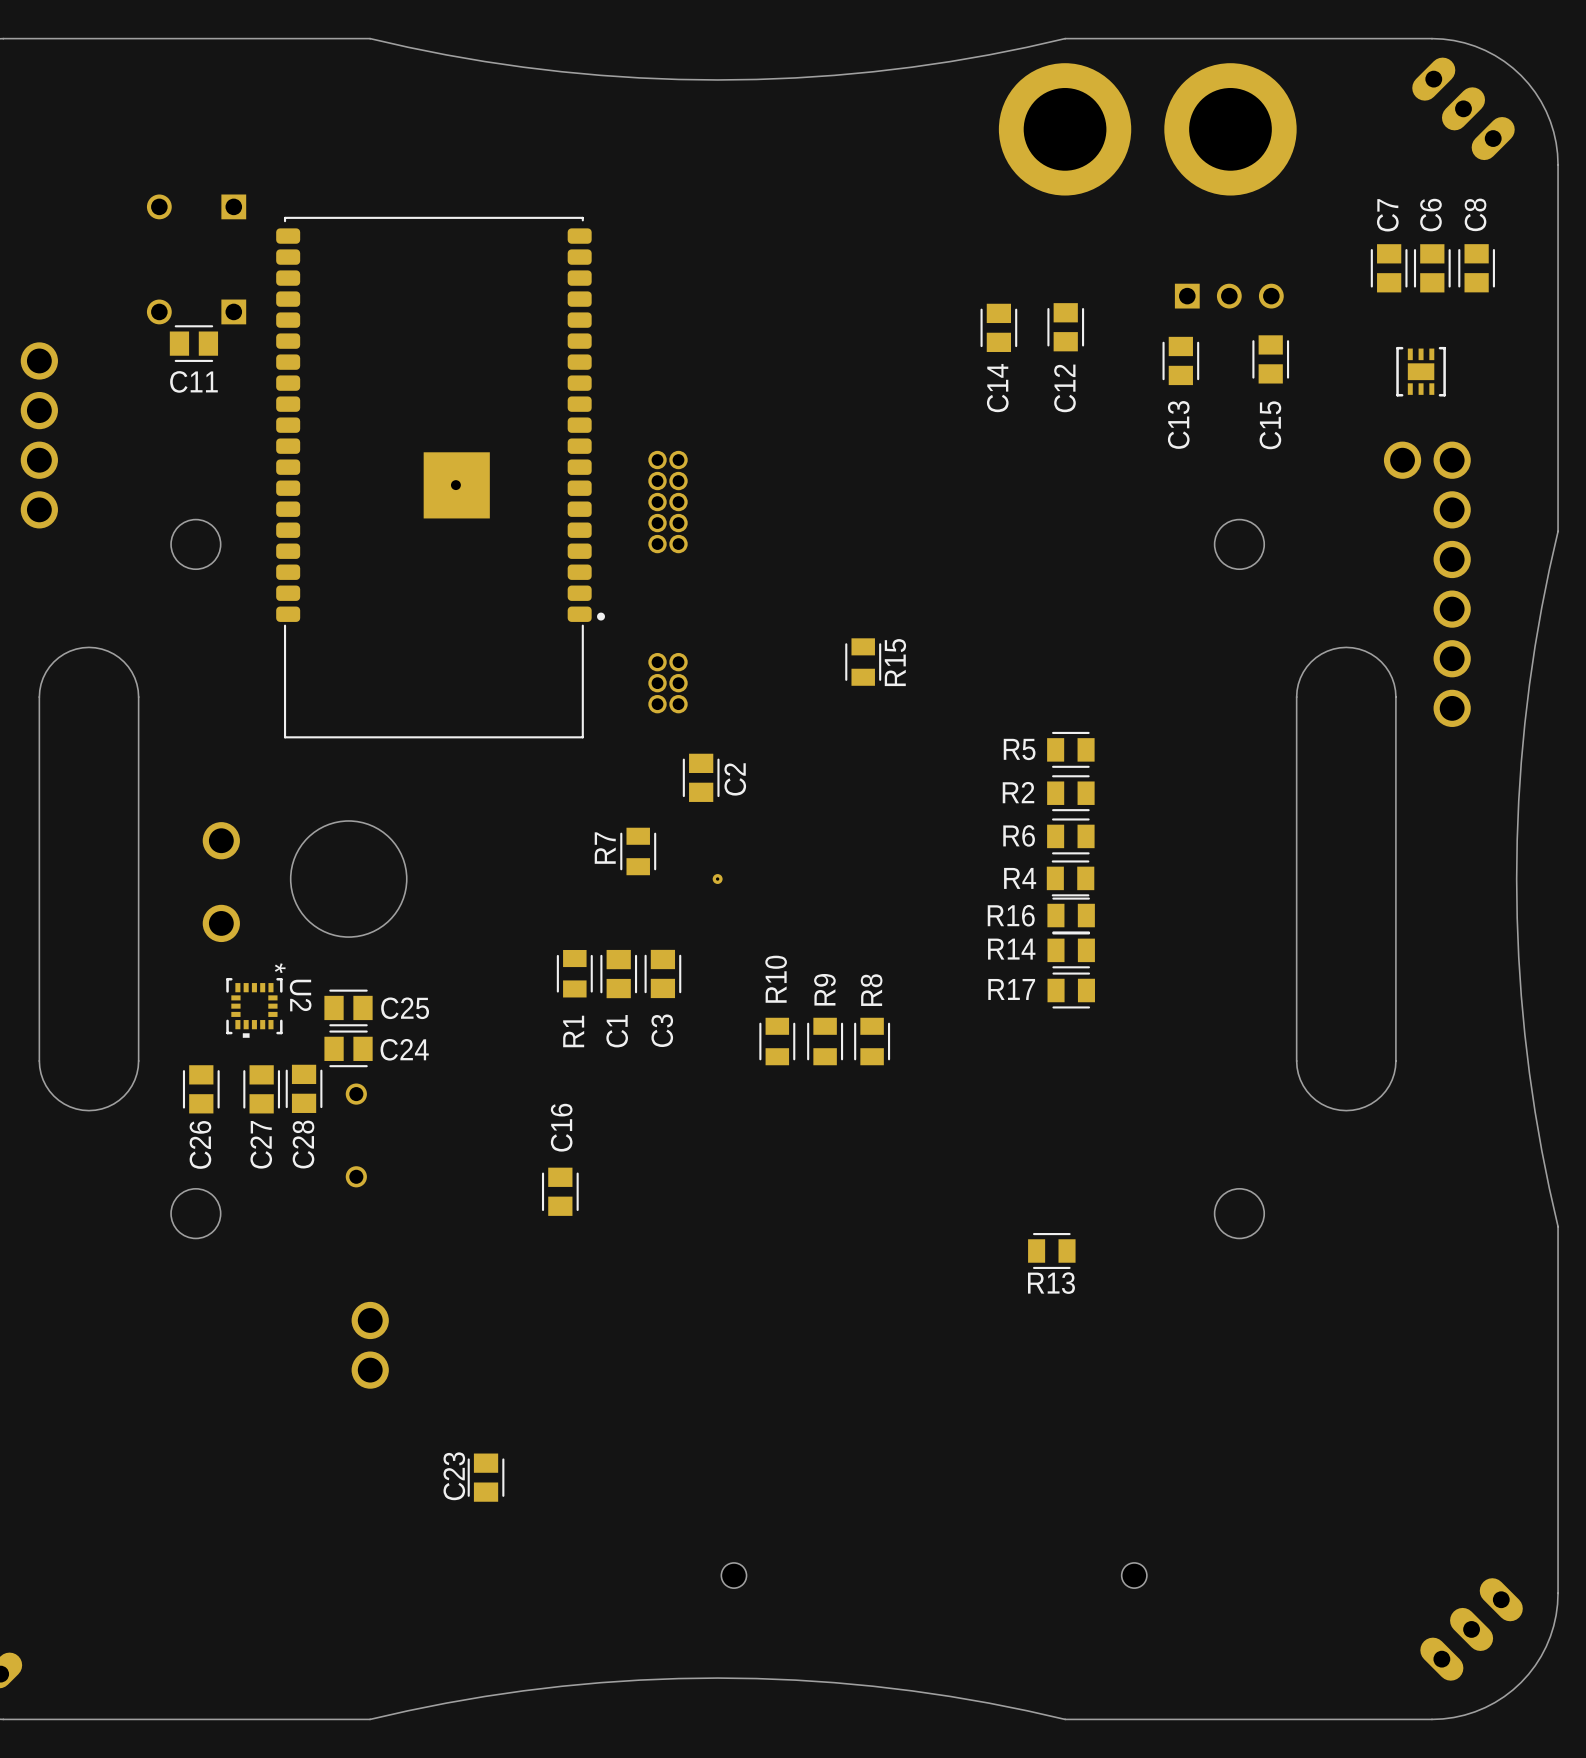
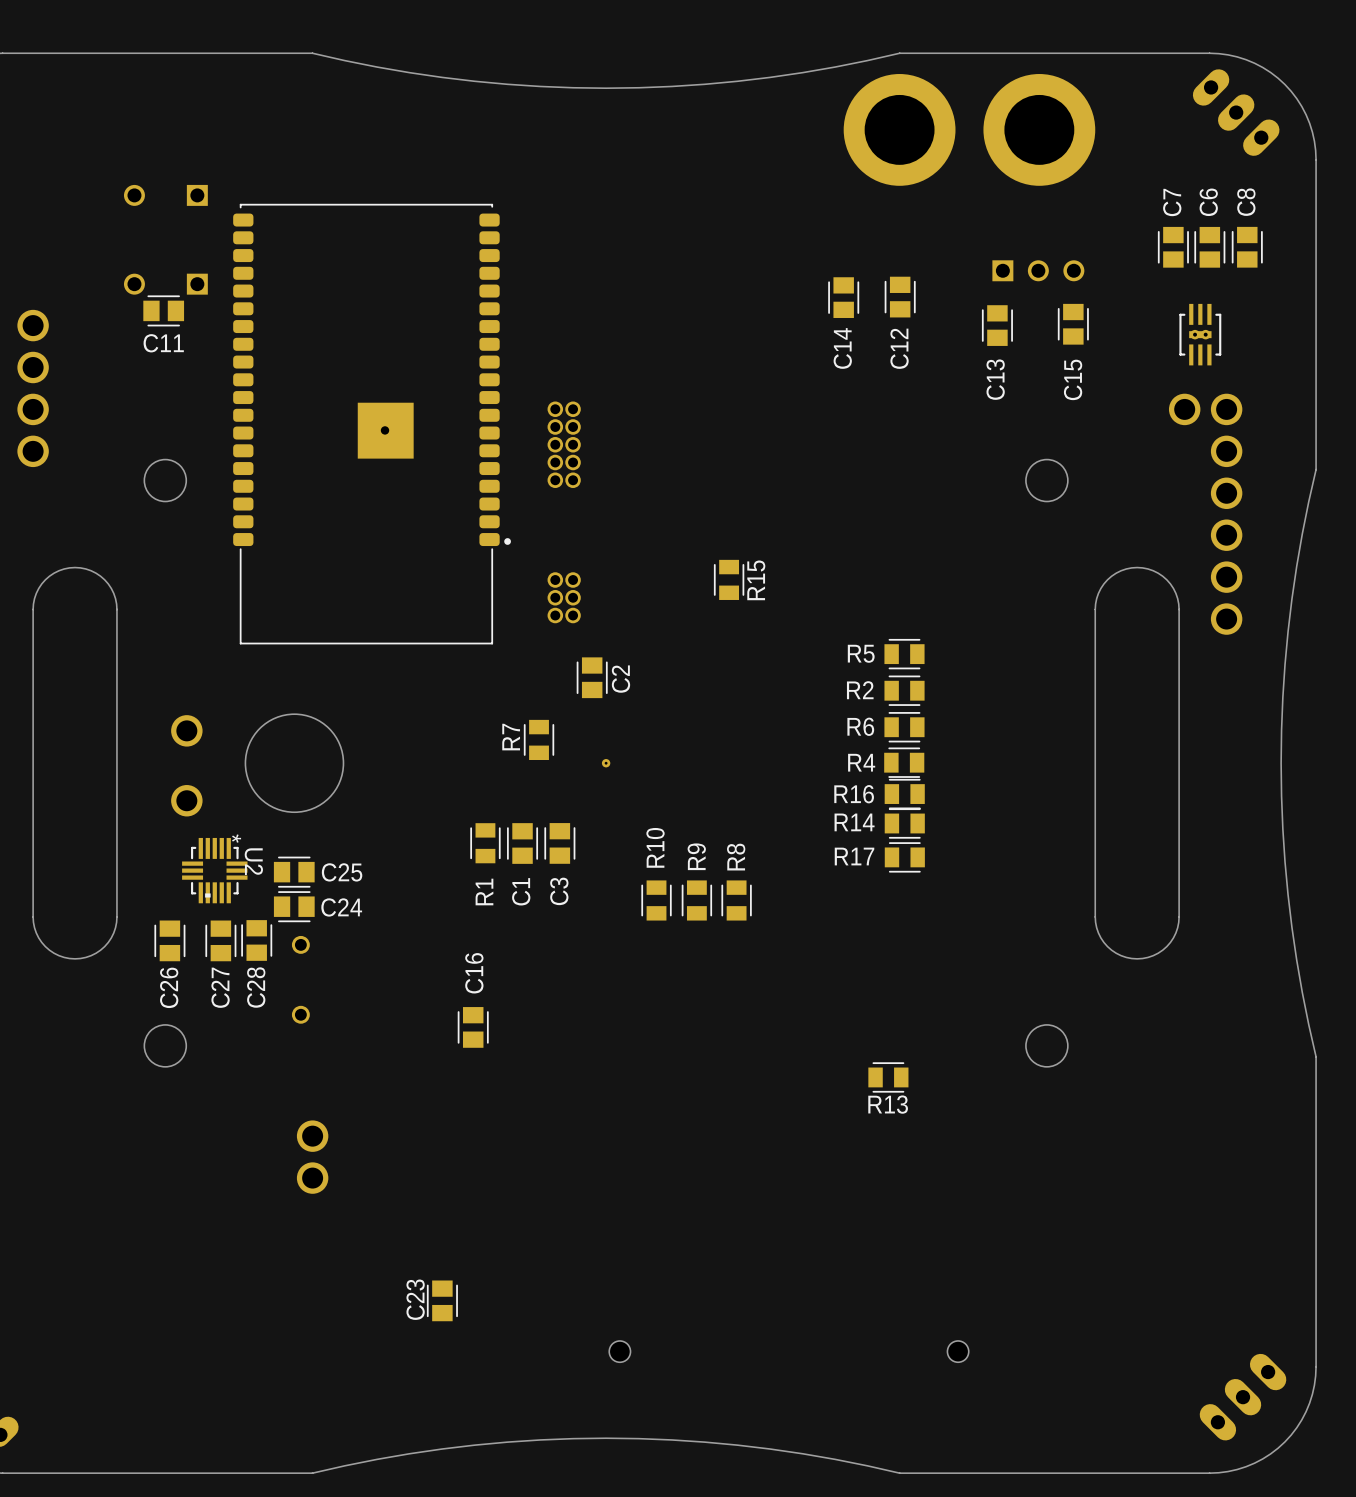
part footprint: [1396, 346, 1446, 397] -> [1179, 303, 1222, 366]
U2 footprint: [226, 978, 283, 1038] -> [182, 837, 248, 904]
C23 position: (486, 1477) -> (442, 1300)

